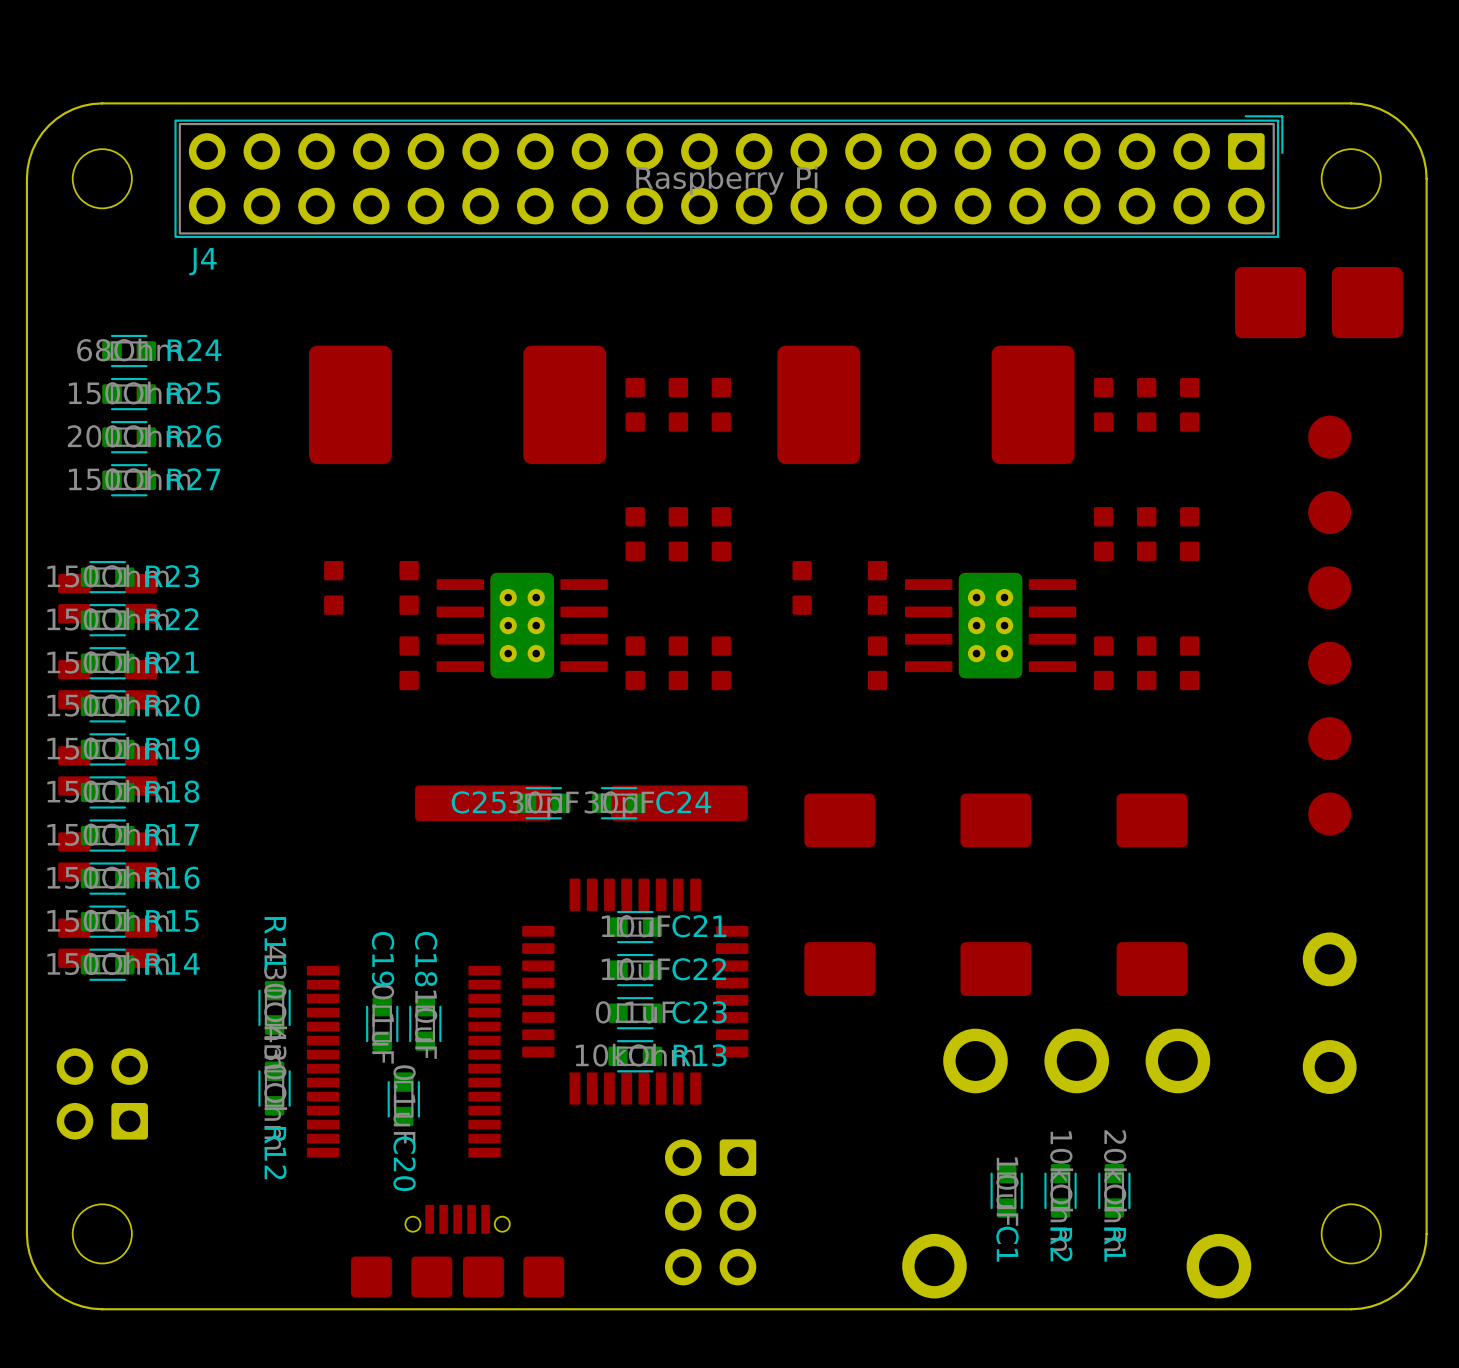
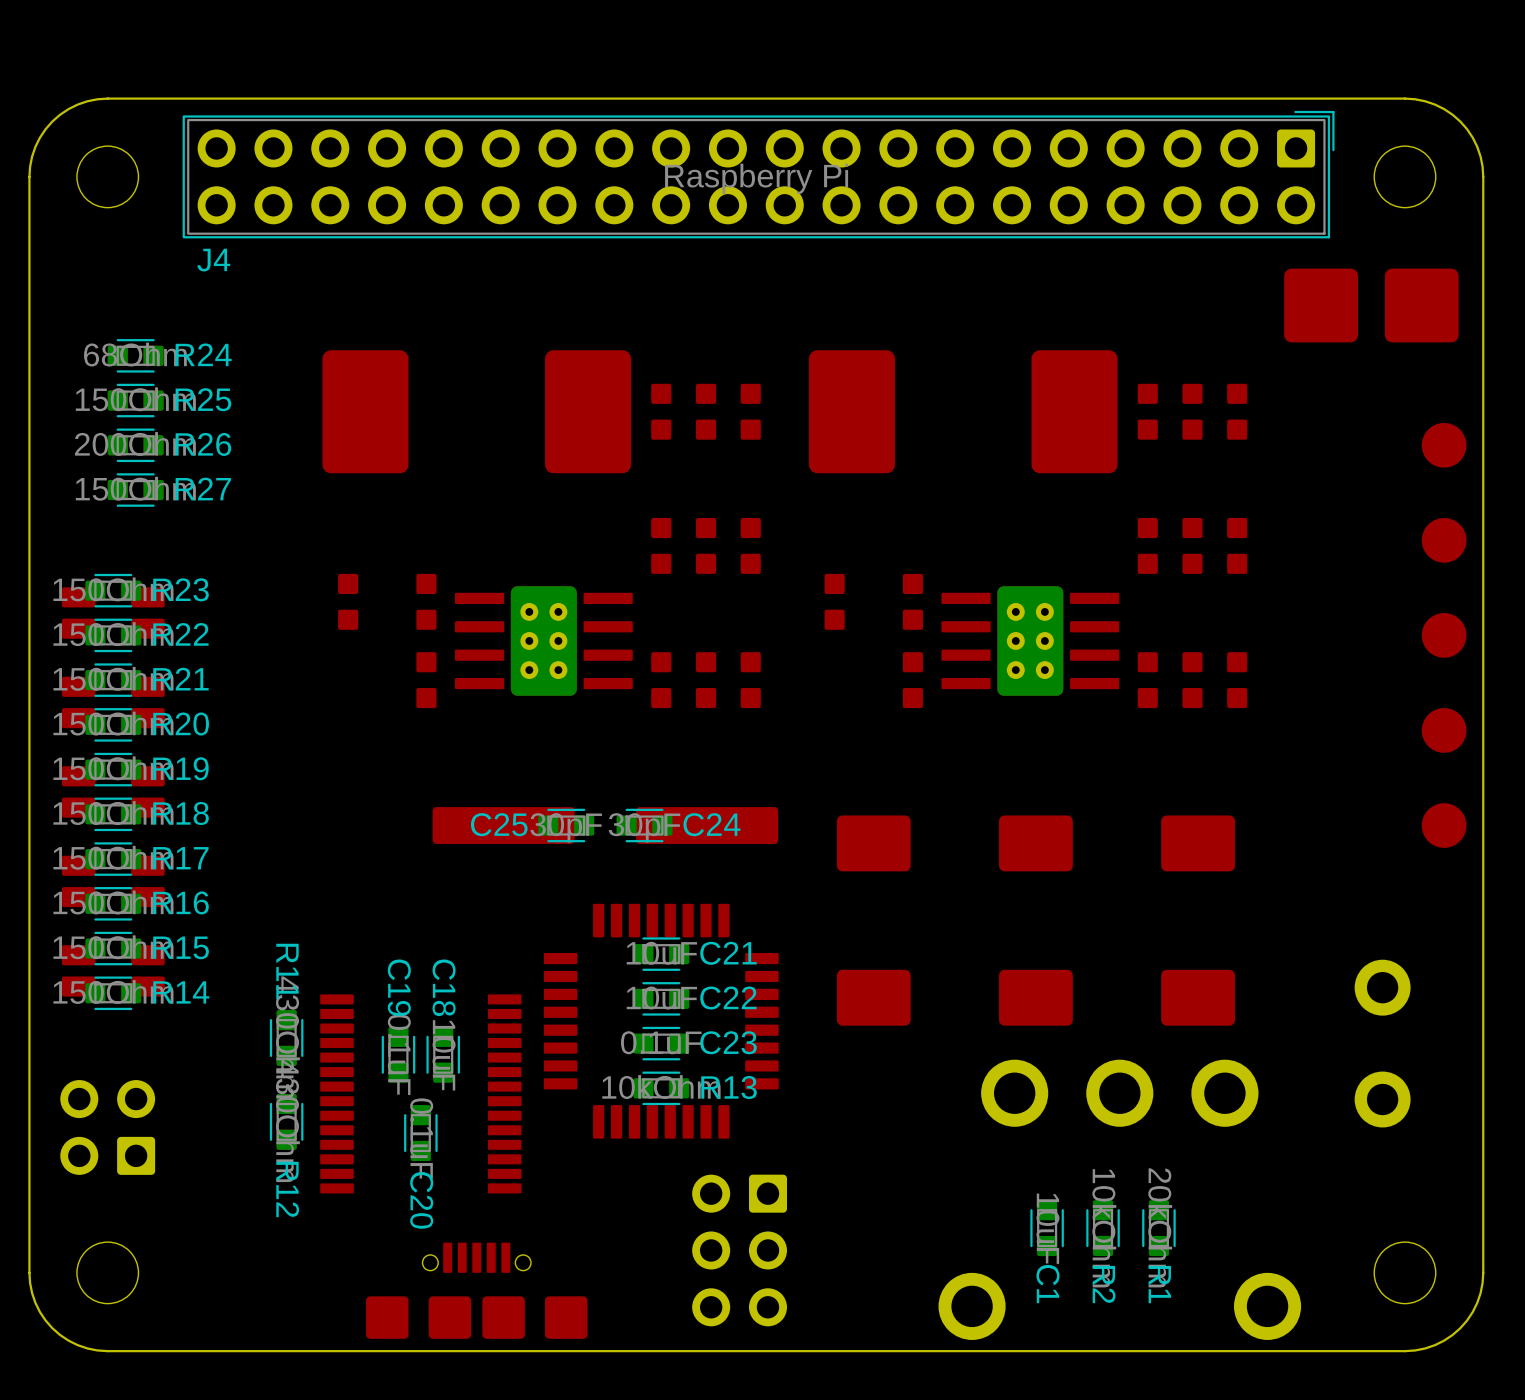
part: (1329, 437) -> none
part: none -> (1444, 445)
part: (1329, 512) -> none
part: none -> (1444, 540)
part: (1329, 587) -> none
part: none -> (1444, 635)
part: (1329, 663) -> none
part: none -> (1444, 730)
part: (1329, 738) -> none
part: none -> (1444, 825)
part: (1329, 813) -> none

